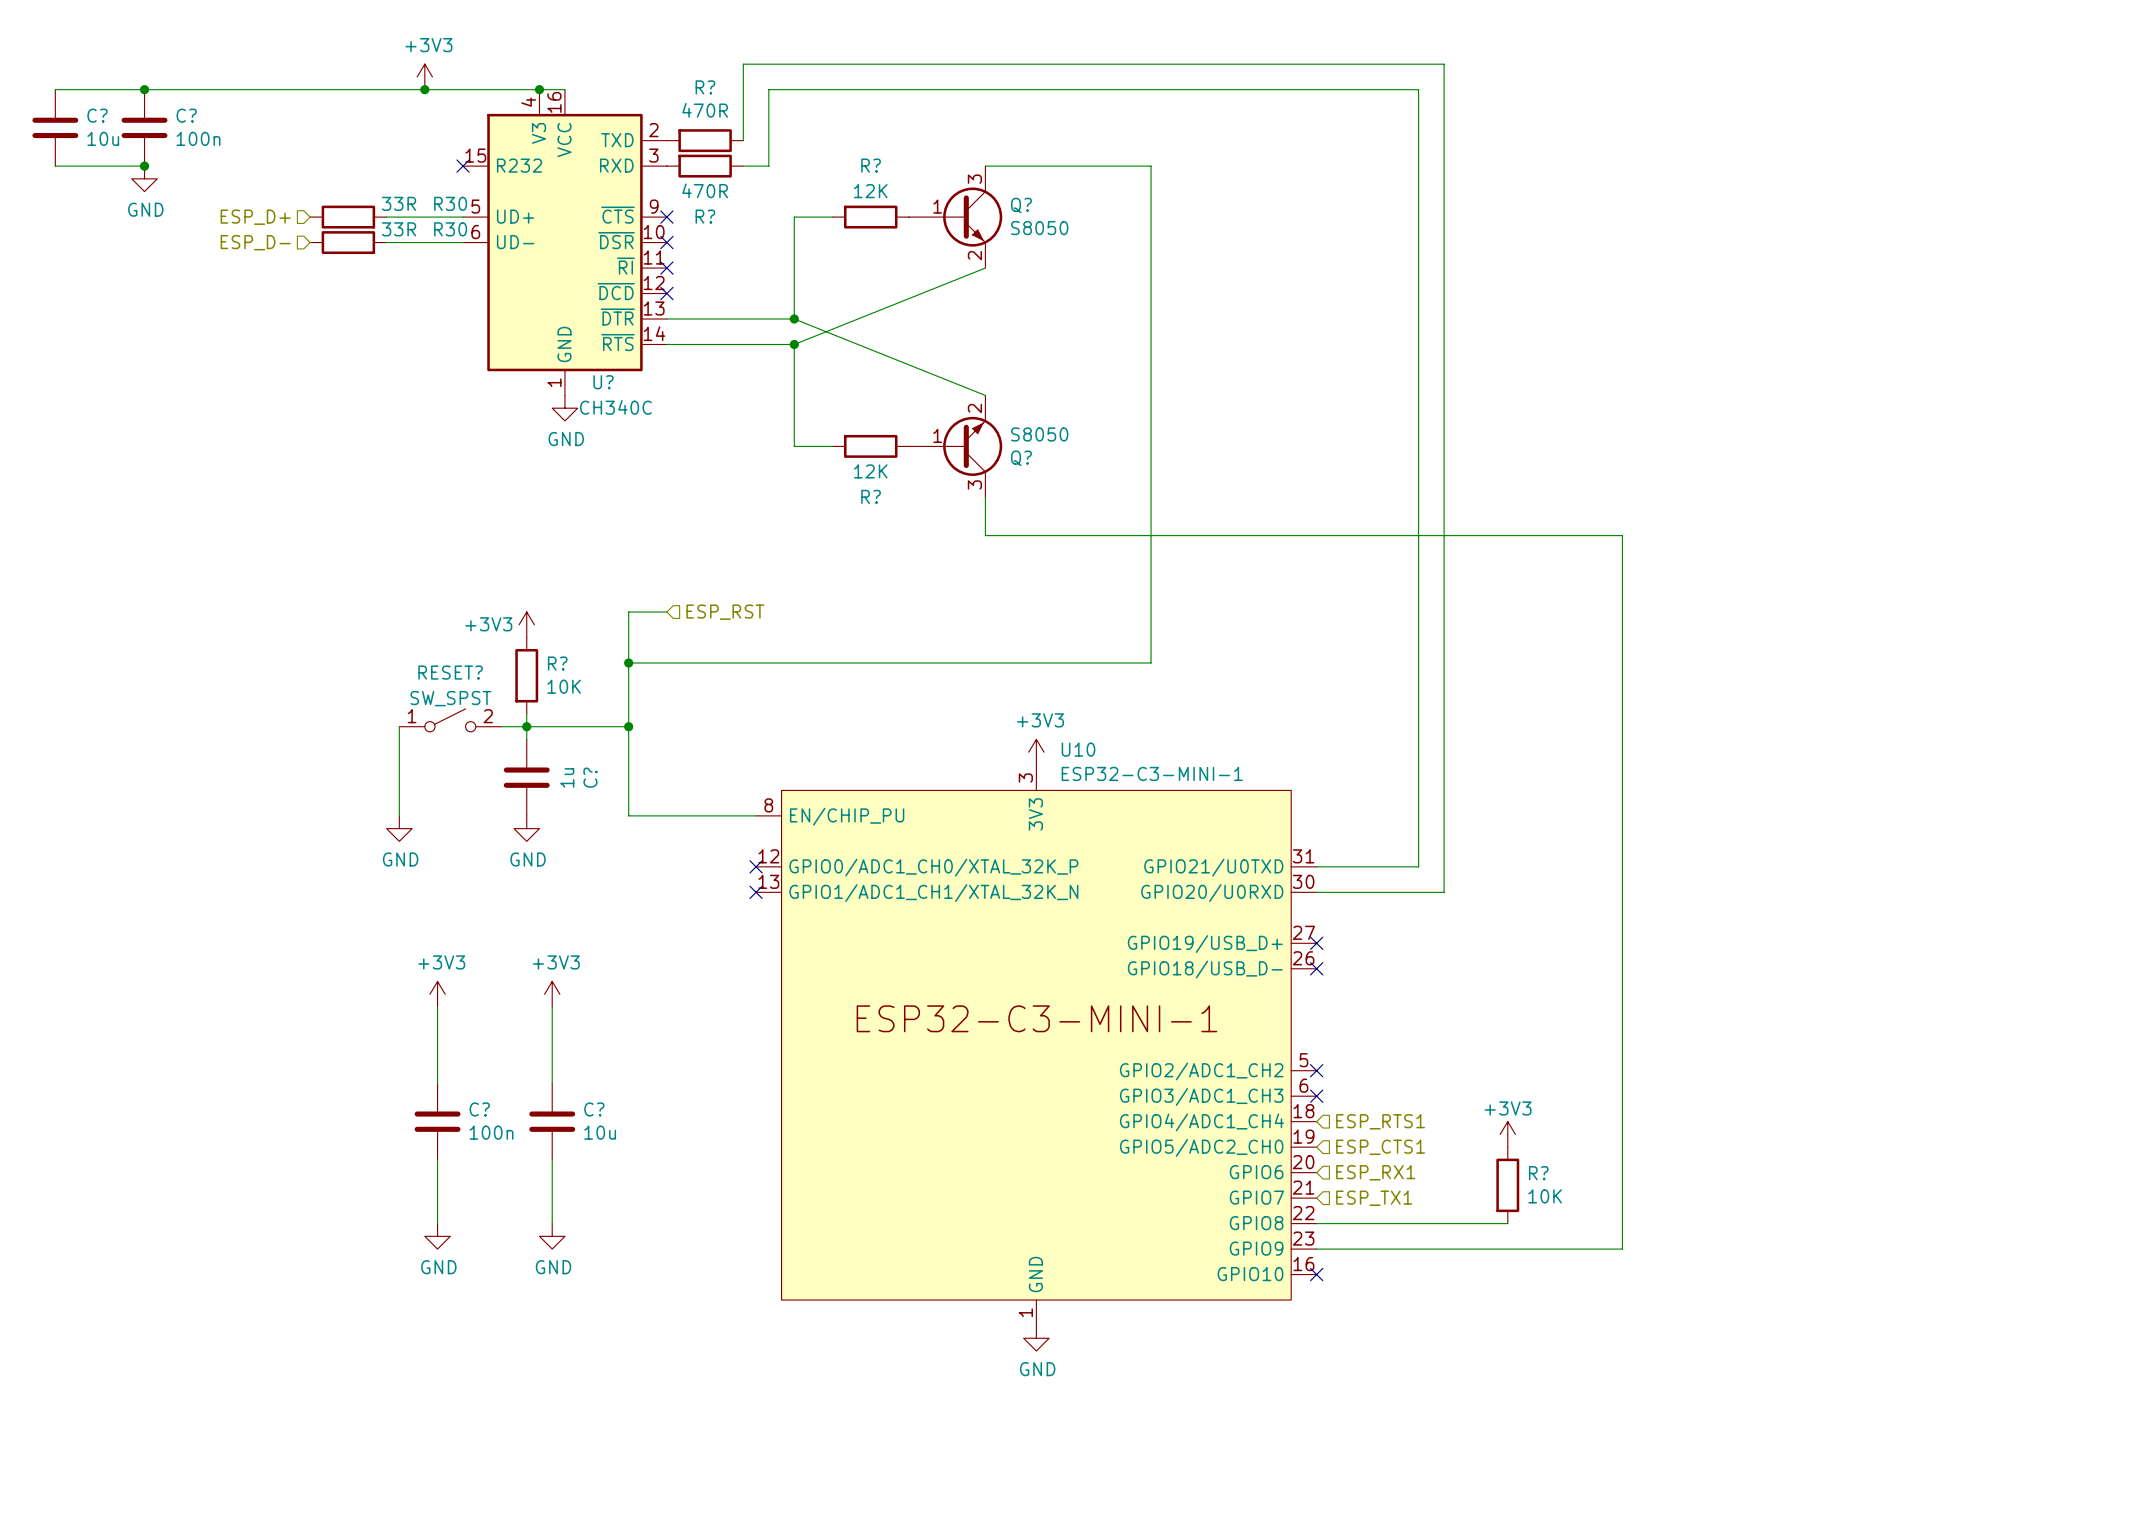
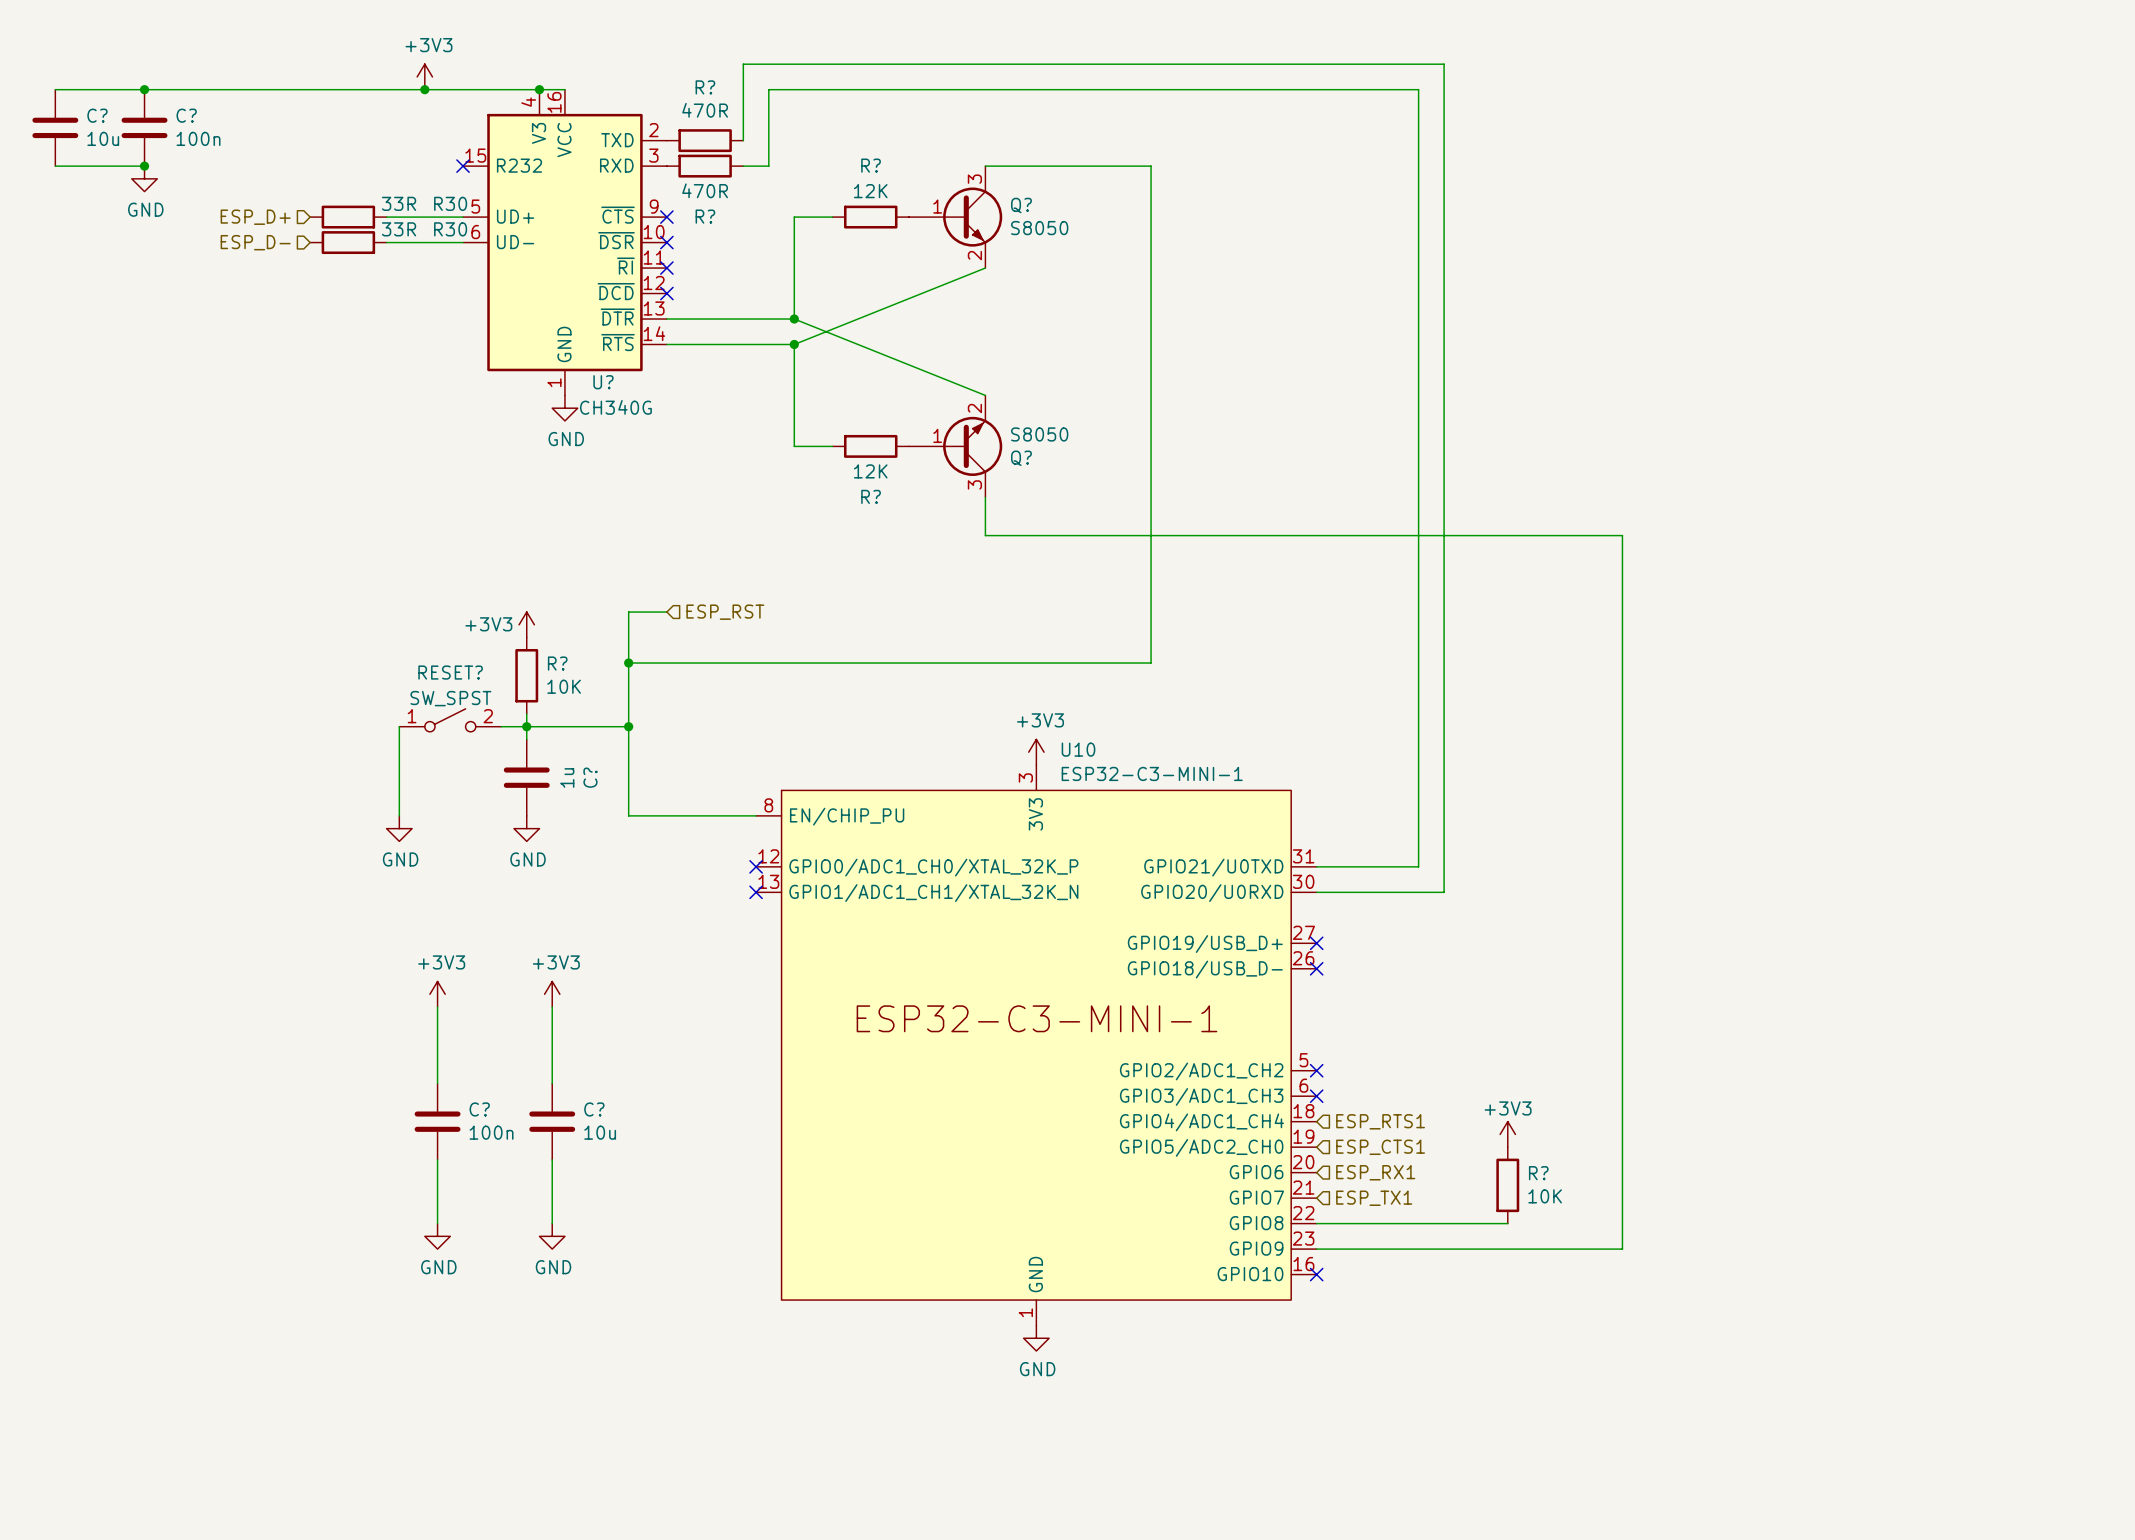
U? value: CH340C (615, 407) -> CH340G (615, 407)

